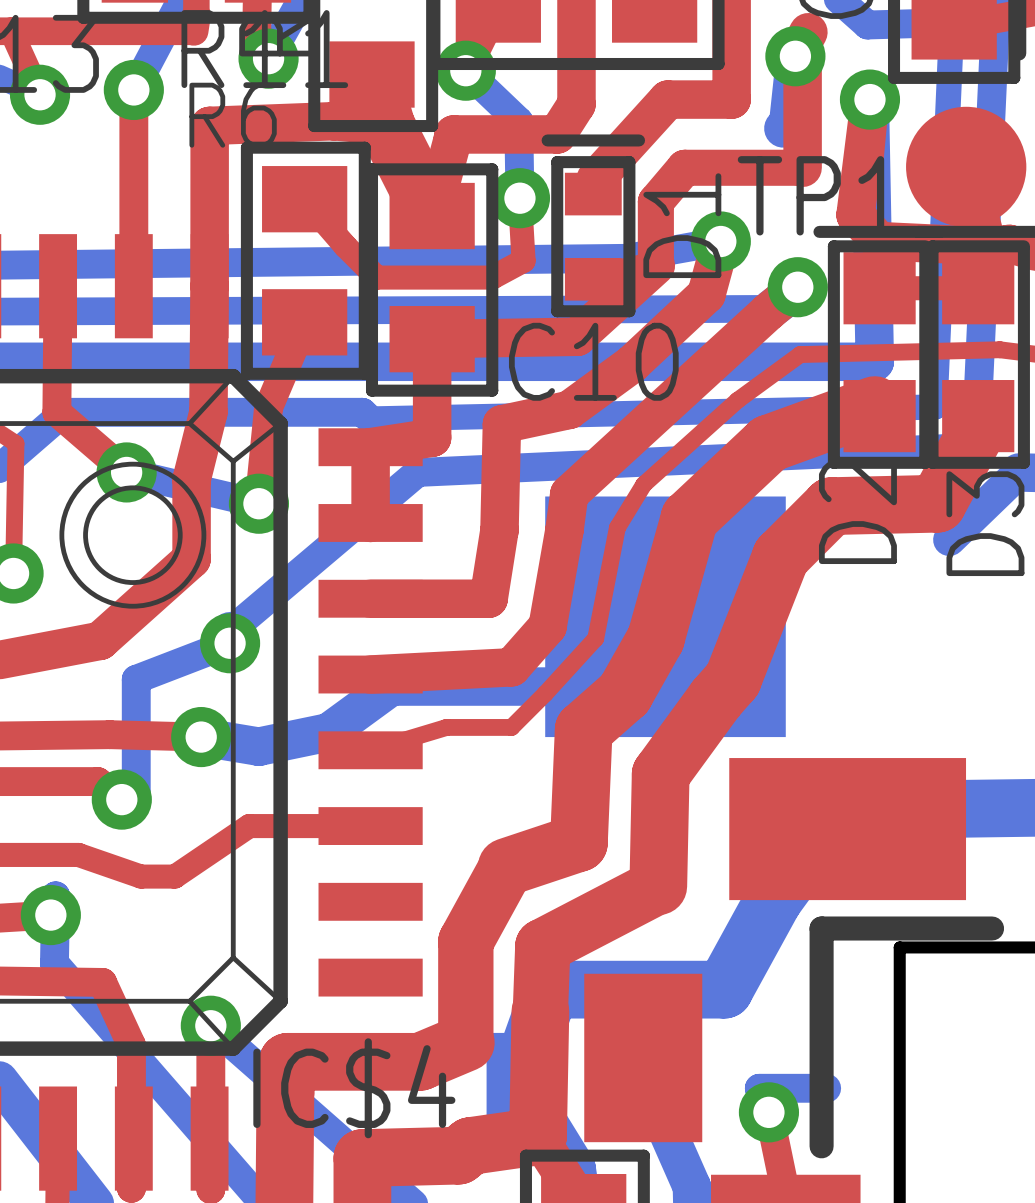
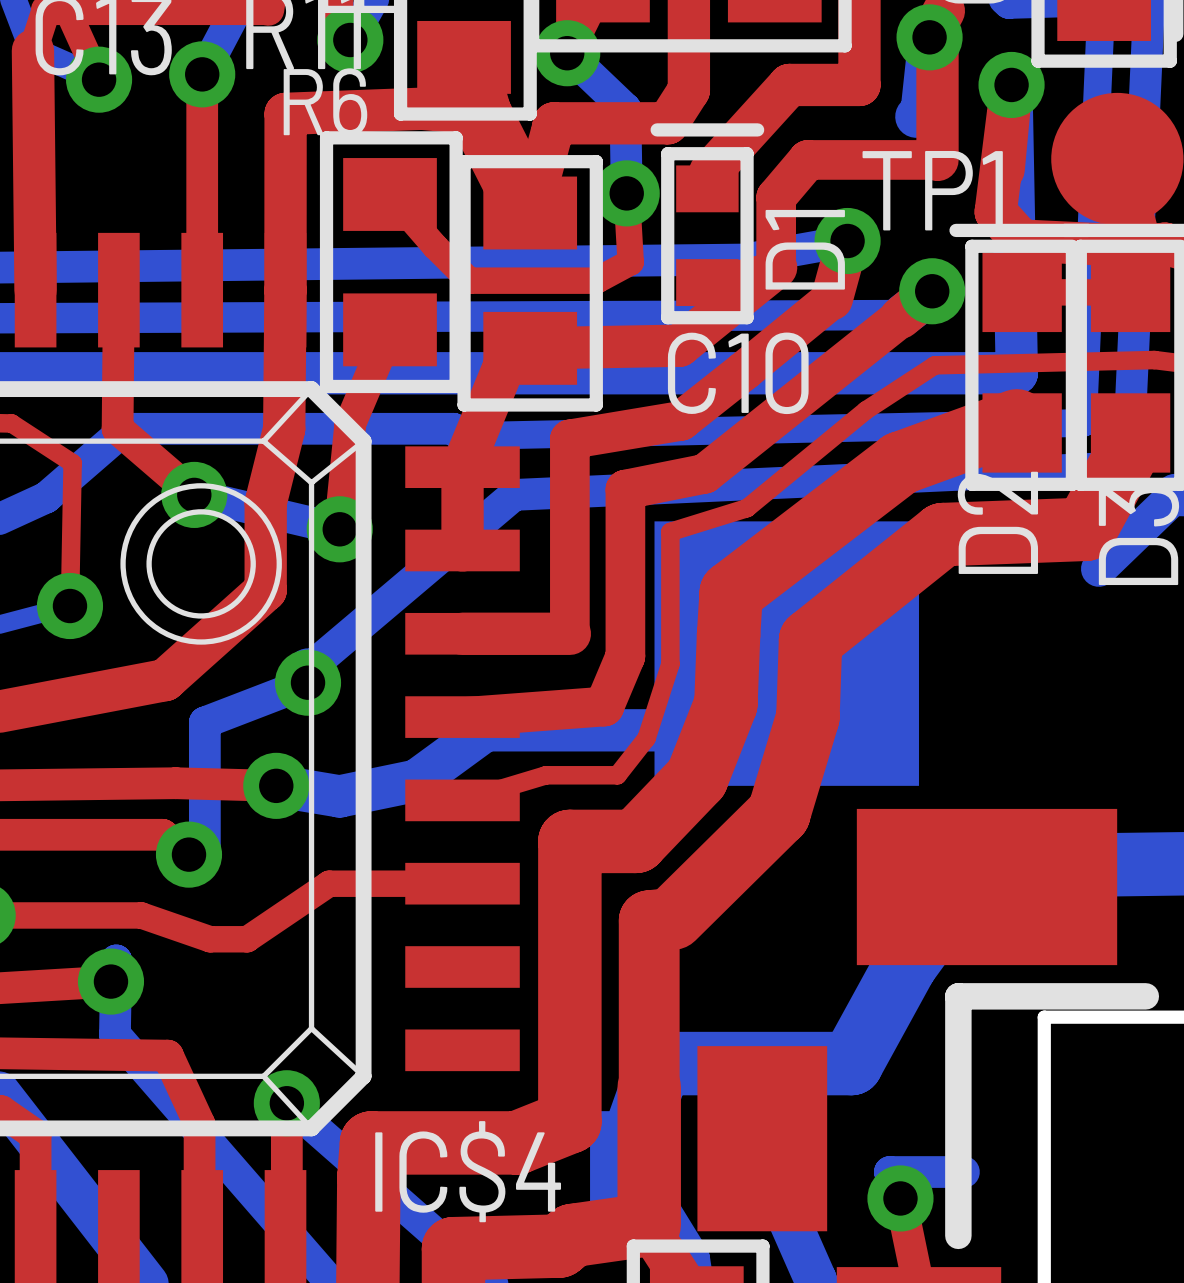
top track: (655, 265) (577, 336) (432, 339) (432, 437) (370, 447) -> (776, 267) (679, 345) (530, 348) (503, 366) (462, 467)
top track: (706, 294) (631, 364) (569, 409) (501, 424) (499, 530) (488, 598) (468, 598) -> (831, 299) (680, 420) (569, 439) (569, 633)
top track: (768, 311) (569, 494) (547, 626) (511, 667) (370, 674) -> (900, 317) (704, 473) (625, 489) (625, 656) (604, 706) (462, 717)
top track: (800, 354) (737, 400) (643, 484) (617, 527) (595, 638) (511, 727) -> (934, 365) (866, 410) (747, 508) (670, 531) (670, 664) (646, 738) (617, 775)
top track: (768, 443) (689, 518) (655, 638) (624, 693) (583, 729) (578, 842) (506, 866) (465, 941) (465, 1042) (420, 1061) -> (900, 463) (731, 592) (725, 703) (696, 777) (635, 841) (569, 841) (569, 1121) (516, 1142)
top track: (937, 503) (831, 506) (780, 556) (732, 679) (716, 698) (660, 774) (658, 886) (542, 946) (537, 1136) -> (1085, 529) (942, 534) (810, 640) (807, 717) (778, 813) (673, 918) (649, 920) (649, 1224)

